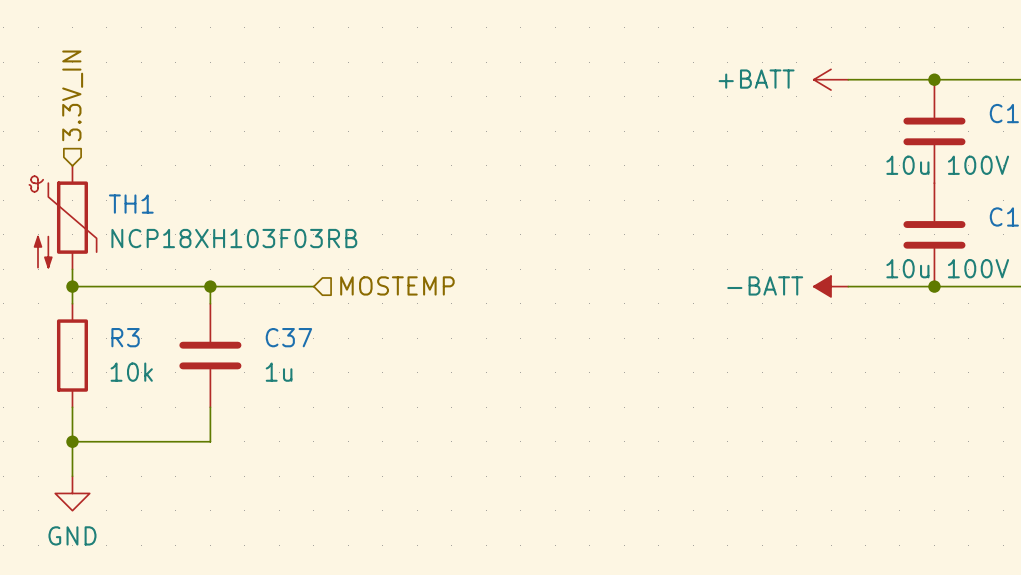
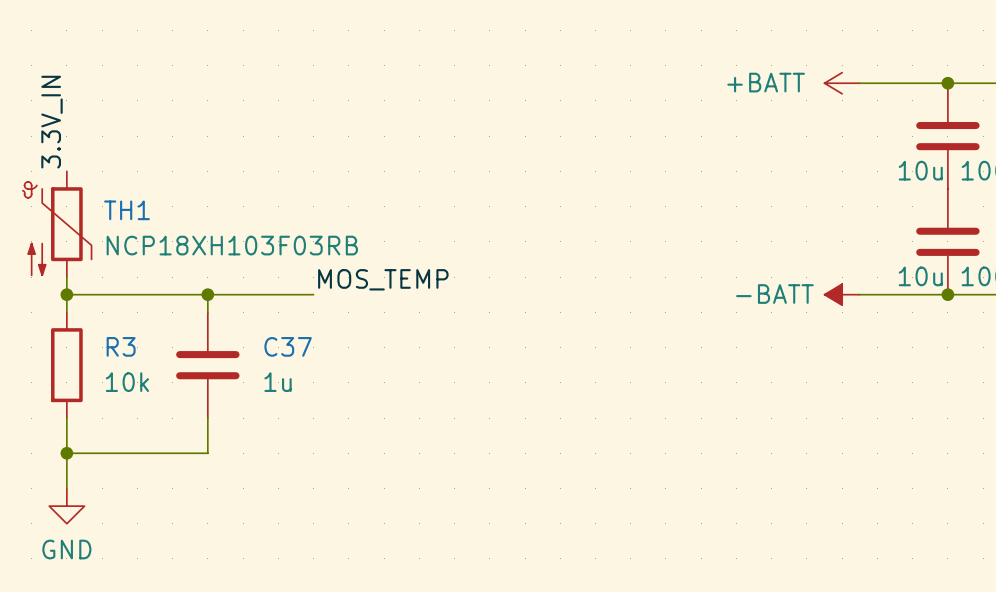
hierarchical label: 3.3V_IN (72, 95) -> none
label: none -> 3.3V_IN (51, 122)
label: none -> MOS_TEMP (383, 279)
hierarchical label: MOSTEMP (397, 285) -> none

